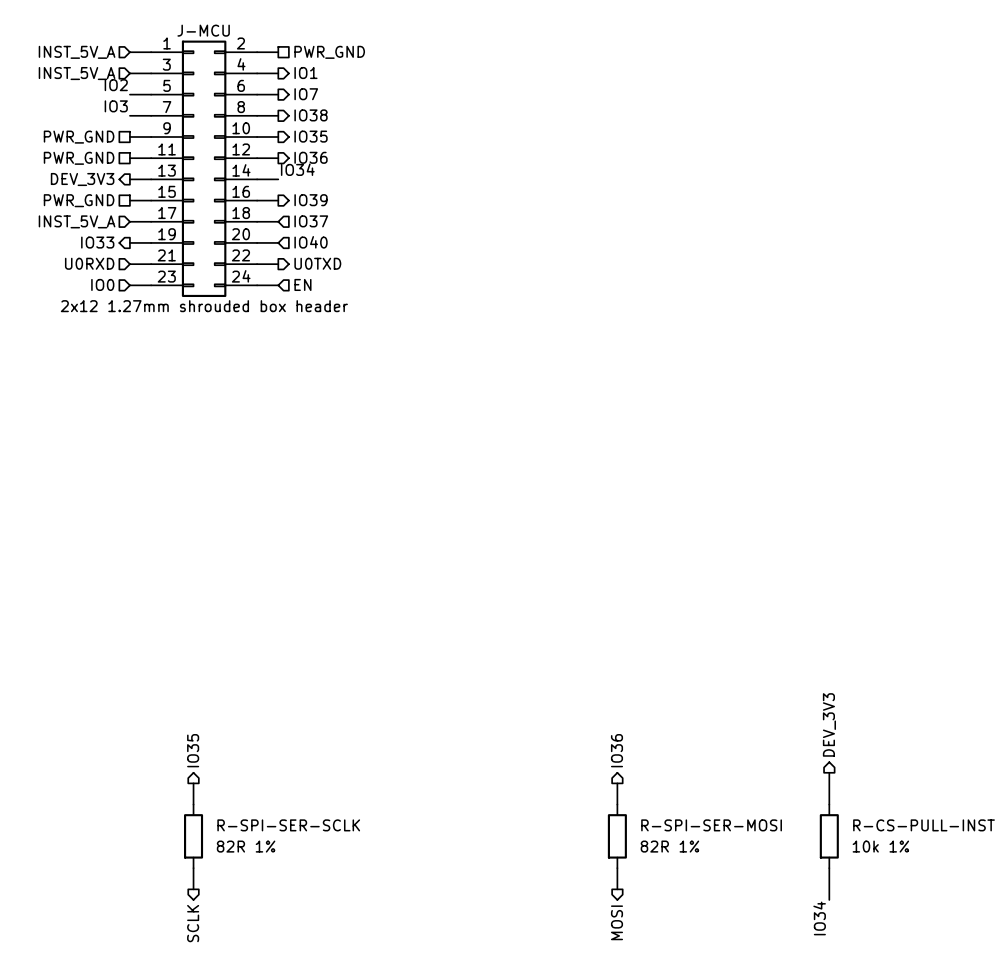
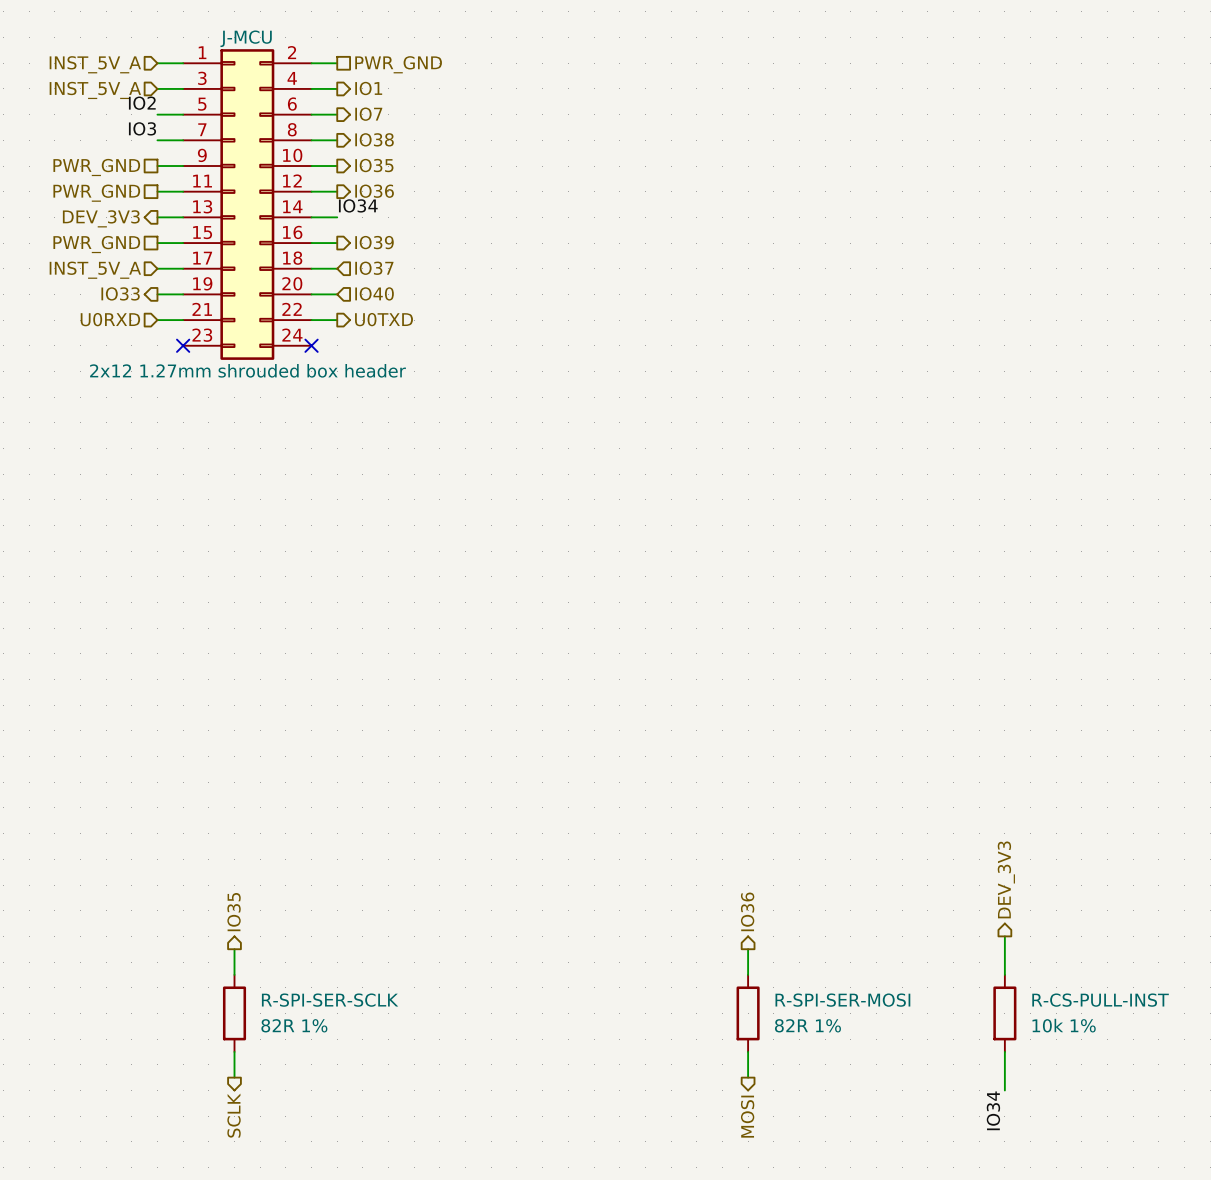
hierarchical label: IO0 (102, 284) -> none
hierarchical label: EN (302, 284) -> none
wire: (129, 285) (151, 285) -> none
no-connect mark: none -> (183, 345)
wire: (257, 285) (278, 285) -> none
no-connect mark: none -> (311, 345)

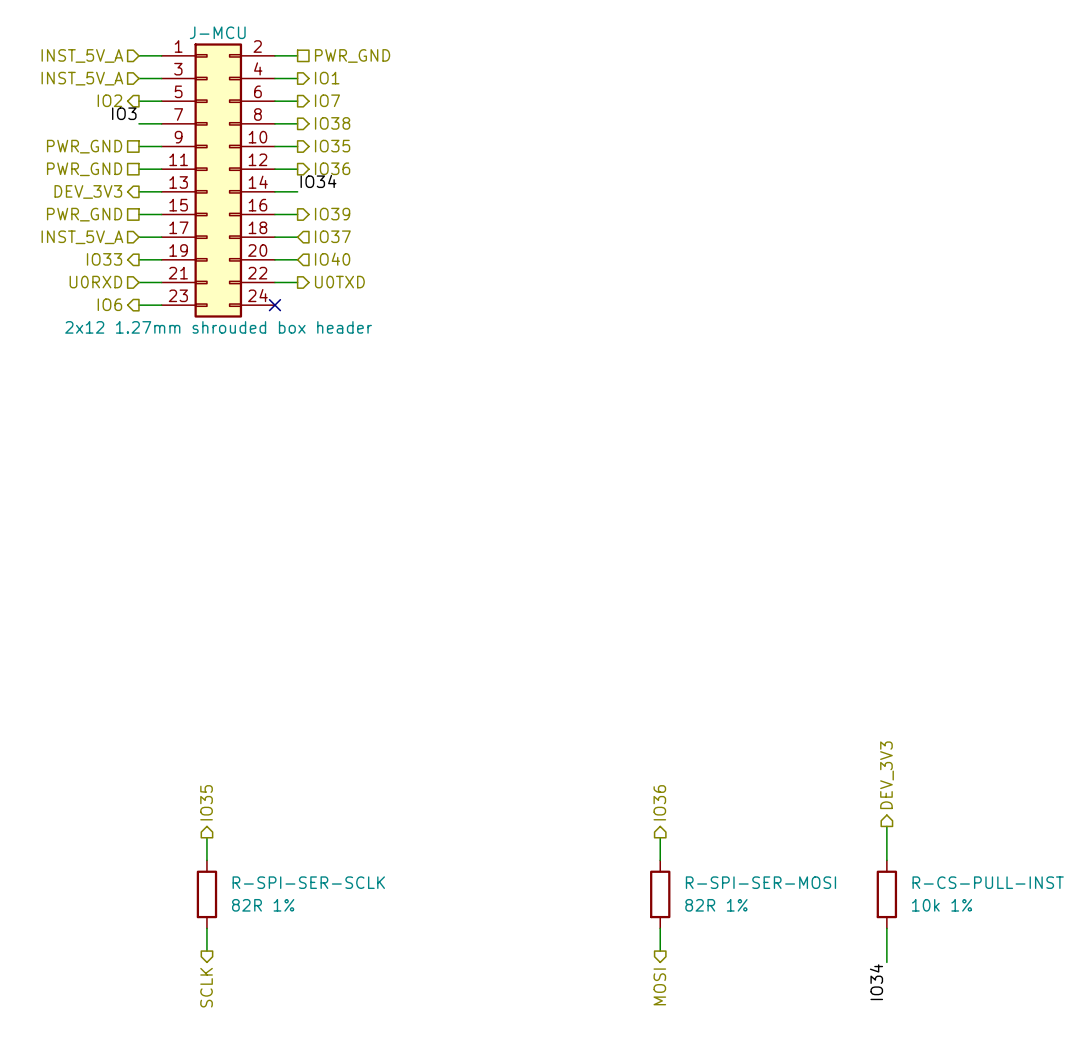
label: IO2 (142, 103) -> none
hierarchical label: none -> IO2 (109, 100)
hierarchical label: none -> IO6 (109, 304)
wire: none -> (138, 305) (161, 305)
no-connect mark: (183, 345) -> none

